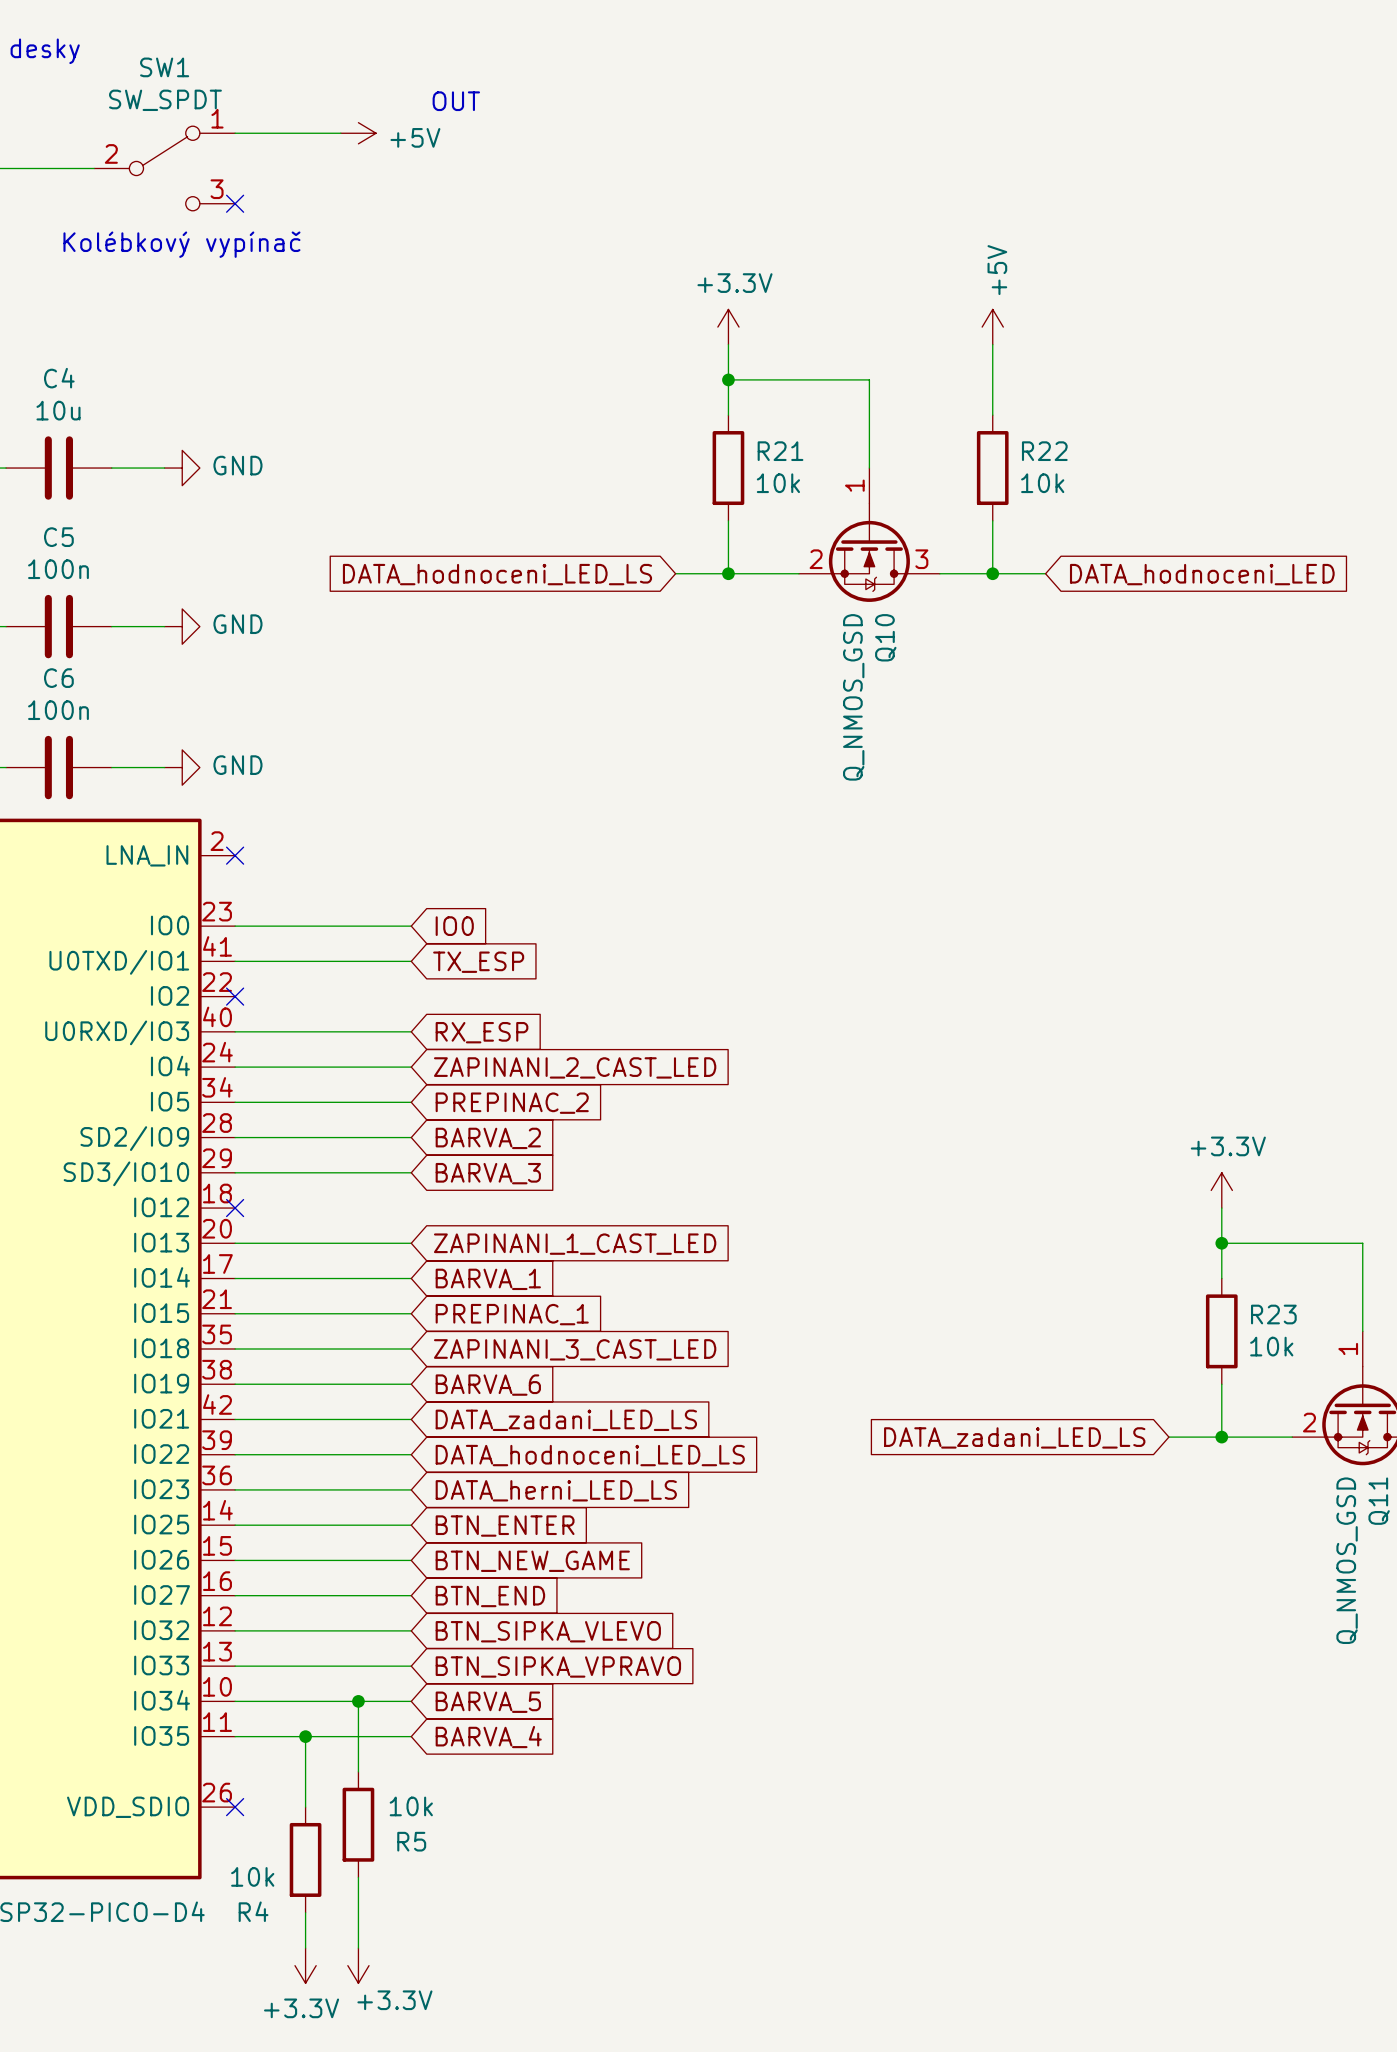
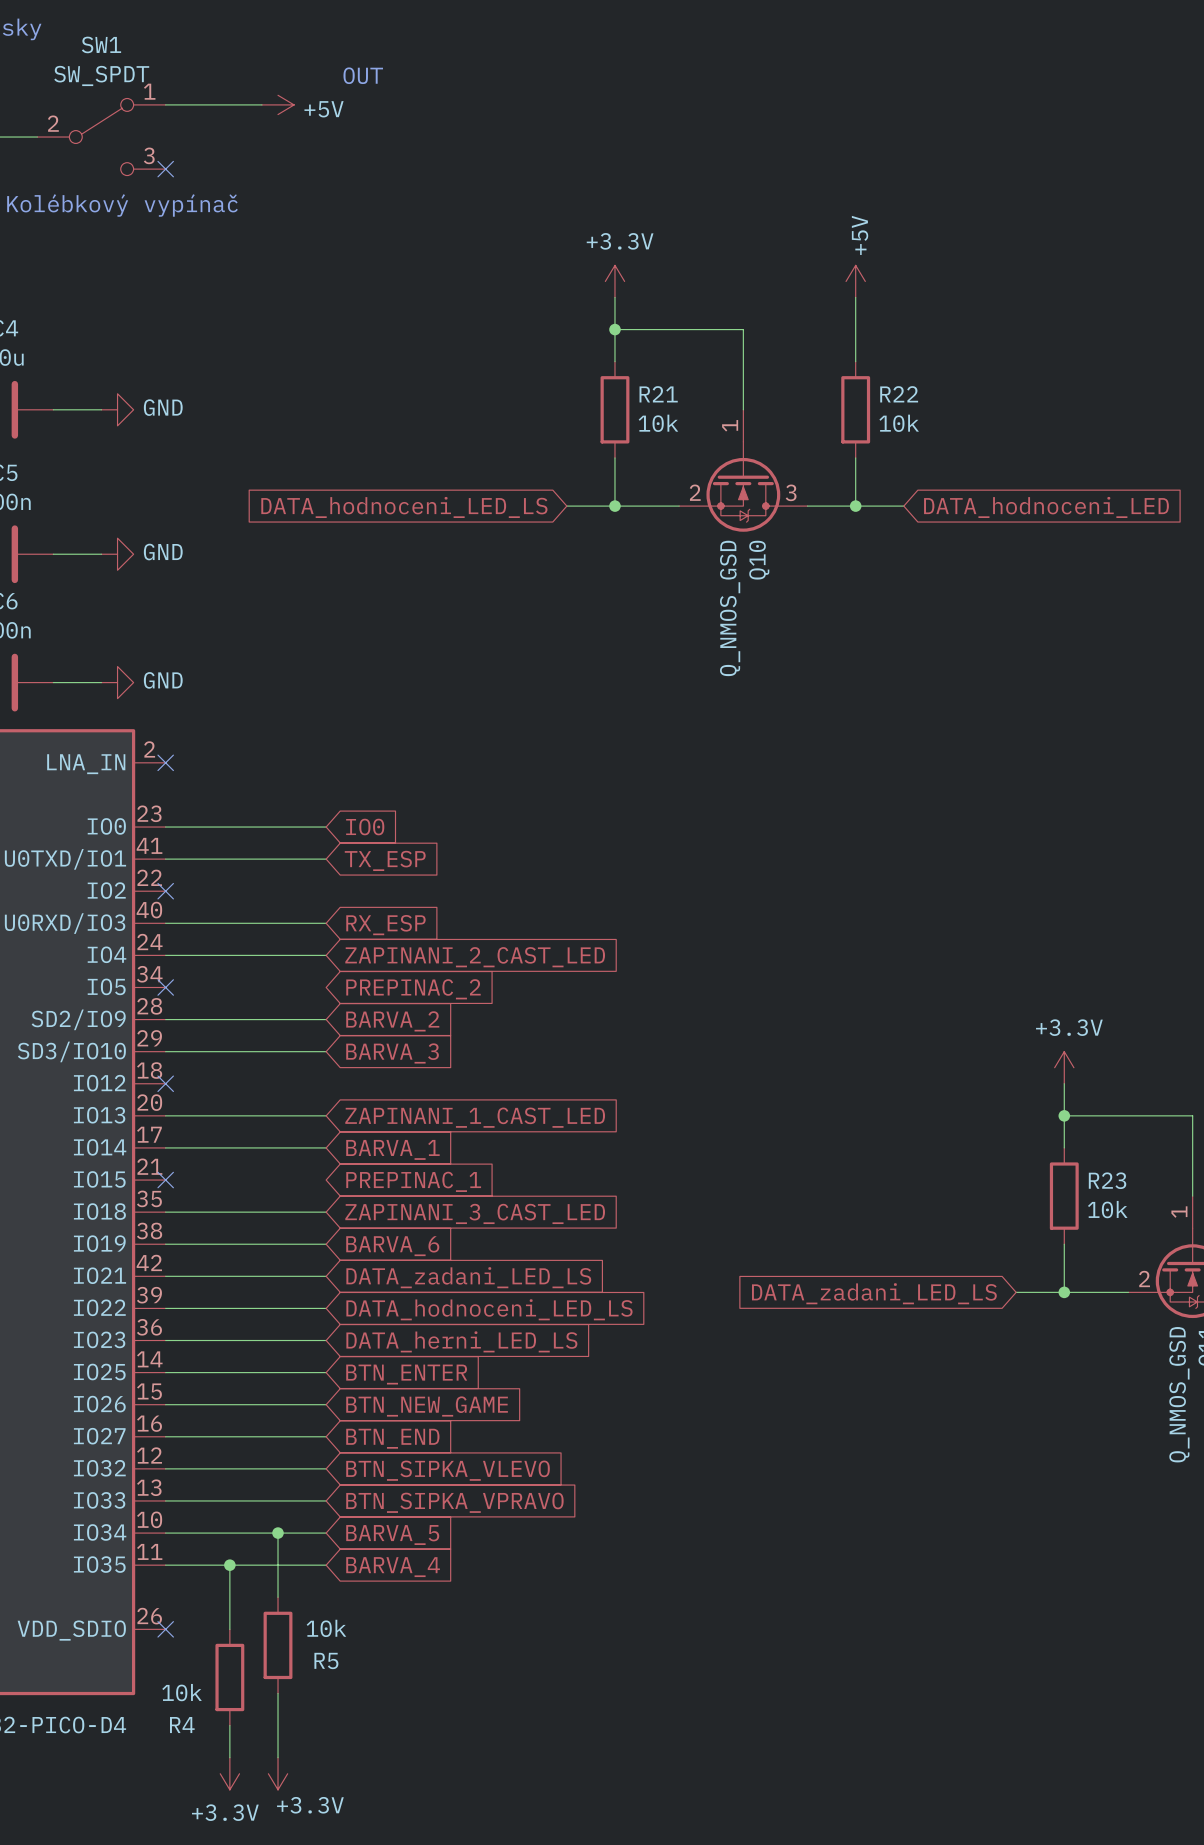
wire: (235, 1102) (411, 1102) -> none
no-connect mark: none -> (165, 987)
wire: (235, 1313) (411, 1313) -> none
no-connect mark: none -> (165, 1180)

